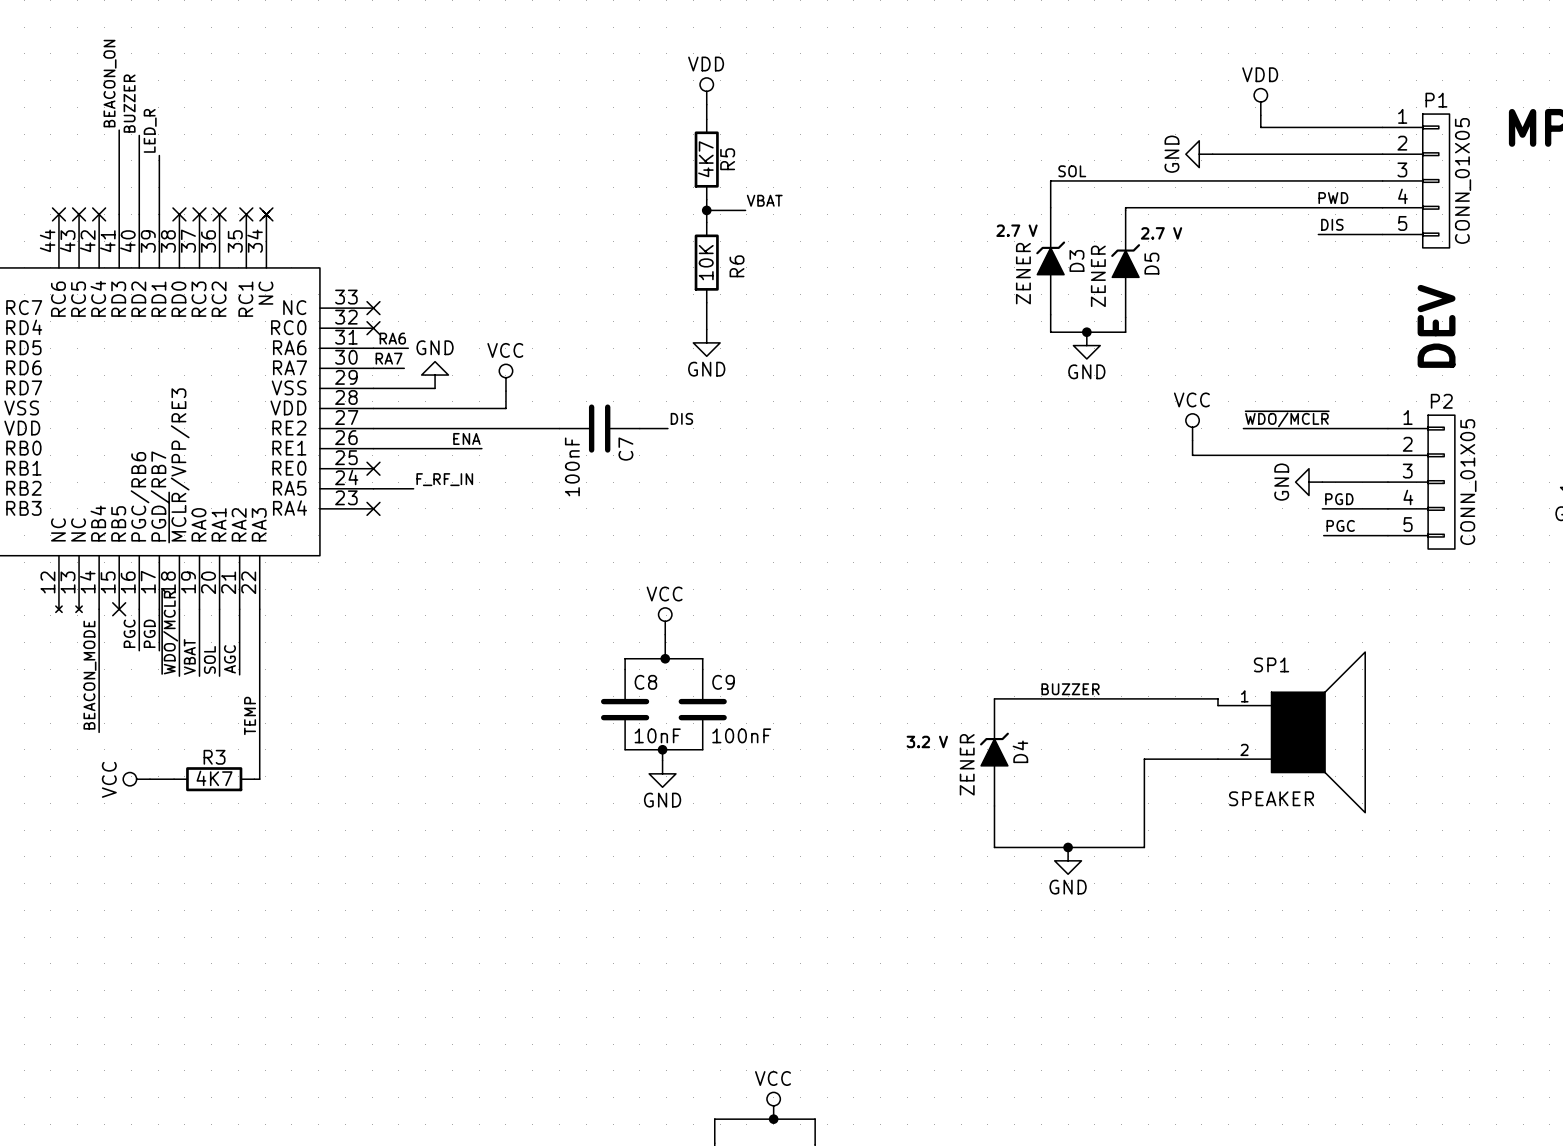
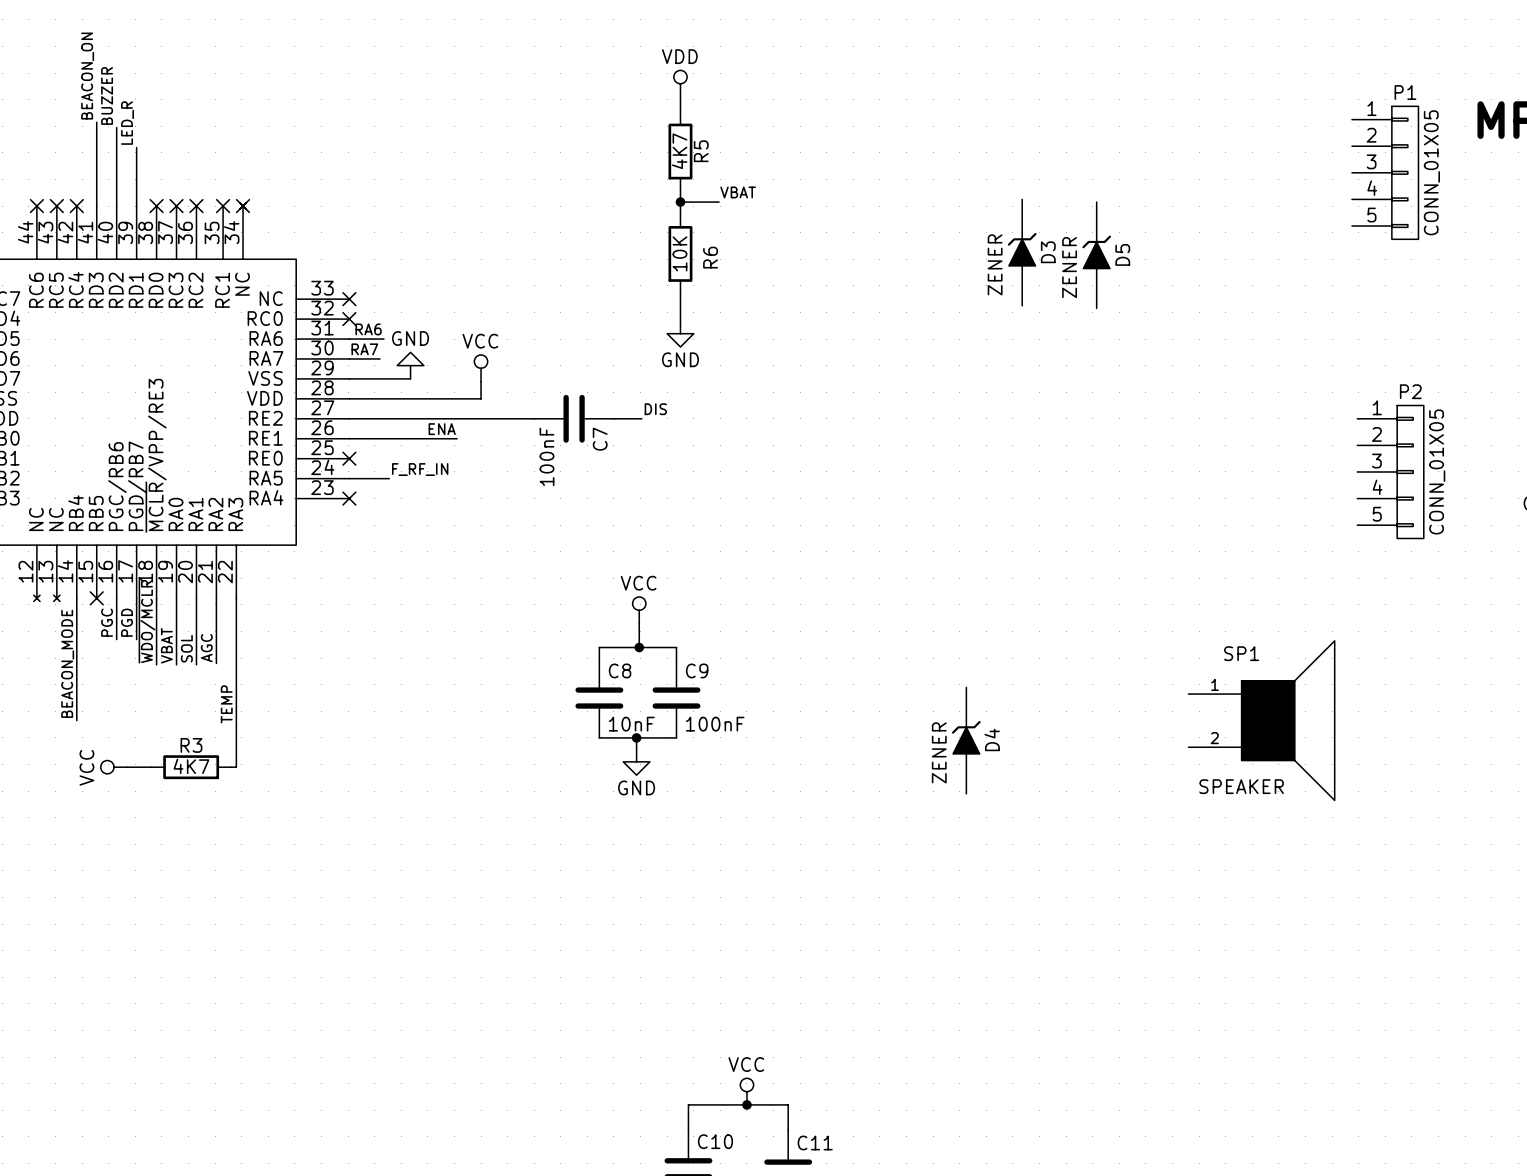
power symbol: VDD (1260, 102) -> none
wire: (1260, 115) (1260, 127) (1382, 127) -> none
power symbol: GND (1199, 154) -> none
wire: (1212, 154) (1382, 154) -> none
label: SOL (1072, 171) -> none
wire: (1382, 180) (1050, 180) (1050, 207) -> none
label: PWD (1333, 198) -> none
wire: (1382, 207) (1125, 207) (1125, 210) -> none
label: DIS (1332, 224) -> none
text: 2.7 V (1016, 230) -> none
text: 2.7 V (1161, 233) -> none
wire: (1318, 234) (1382, 234) -> none
wire: (1050, 314) (1050, 332) (1125, 332) (1125, 317) -> none
text: DEV (1436, 326) -> none
junction: (1086, 332) -> none
power symbol: GND (1086, 345) -> none
label: ~{WDO/MCLR} (1287, 418) -> none
power symbol: VCC (1192, 427) -> none
wire: (1243, 428) (1387, 428) -> none
wire: (1192, 440) (1192, 455) (1387, 455) -> none
power symbol: GND (1308, 482) -> none
wire: (1322, 482) (1387, 482) -> none
label: PGD (1339, 499) -> none
wire: (1322, 508) (1387, 508) -> none
label: PGC (1340, 525) -> none
wire: (1323, 535) (1387, 535) -> none
label: BUZZER (1070, 689) -> none
wire: (994, 698) (1217, 698) (1217, 705) -> none
text: 3.2 V (927, 741) -> none
wire: (1217, 759) (1144, 759) (1144, 847) (994, 847) (994, 805) -> none
junction: (1068, 847) -> none
power symbol: GND (1068, 860) -> none

